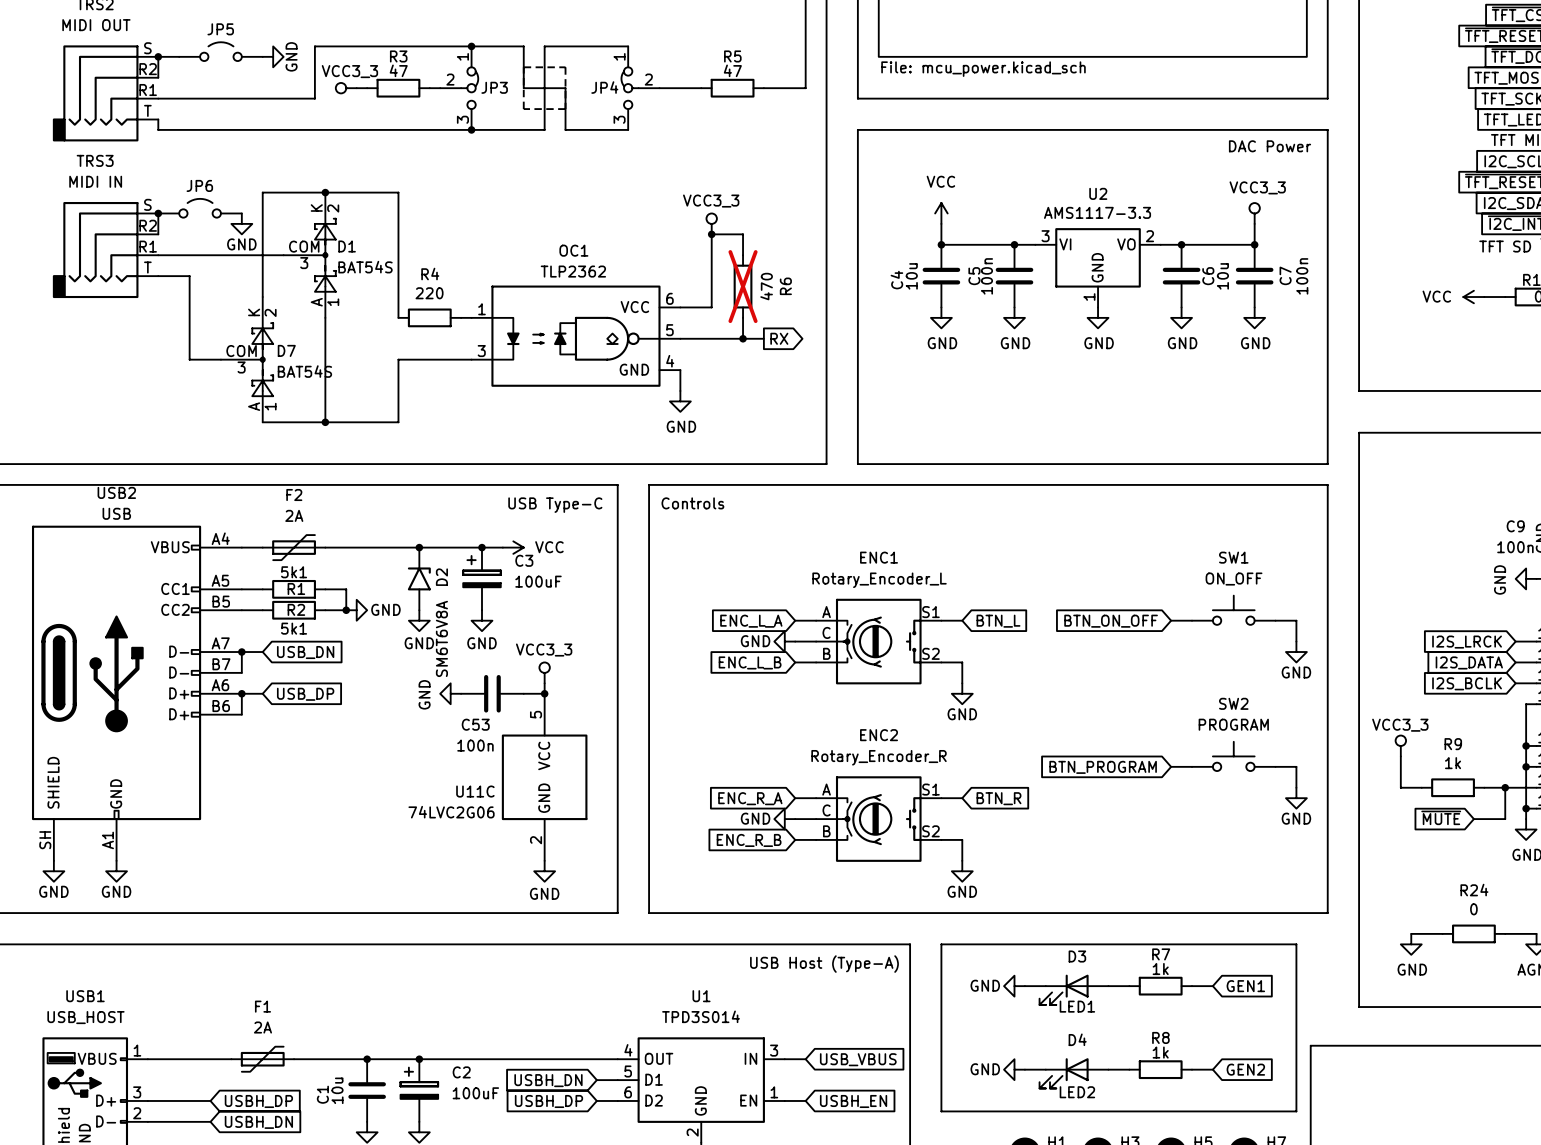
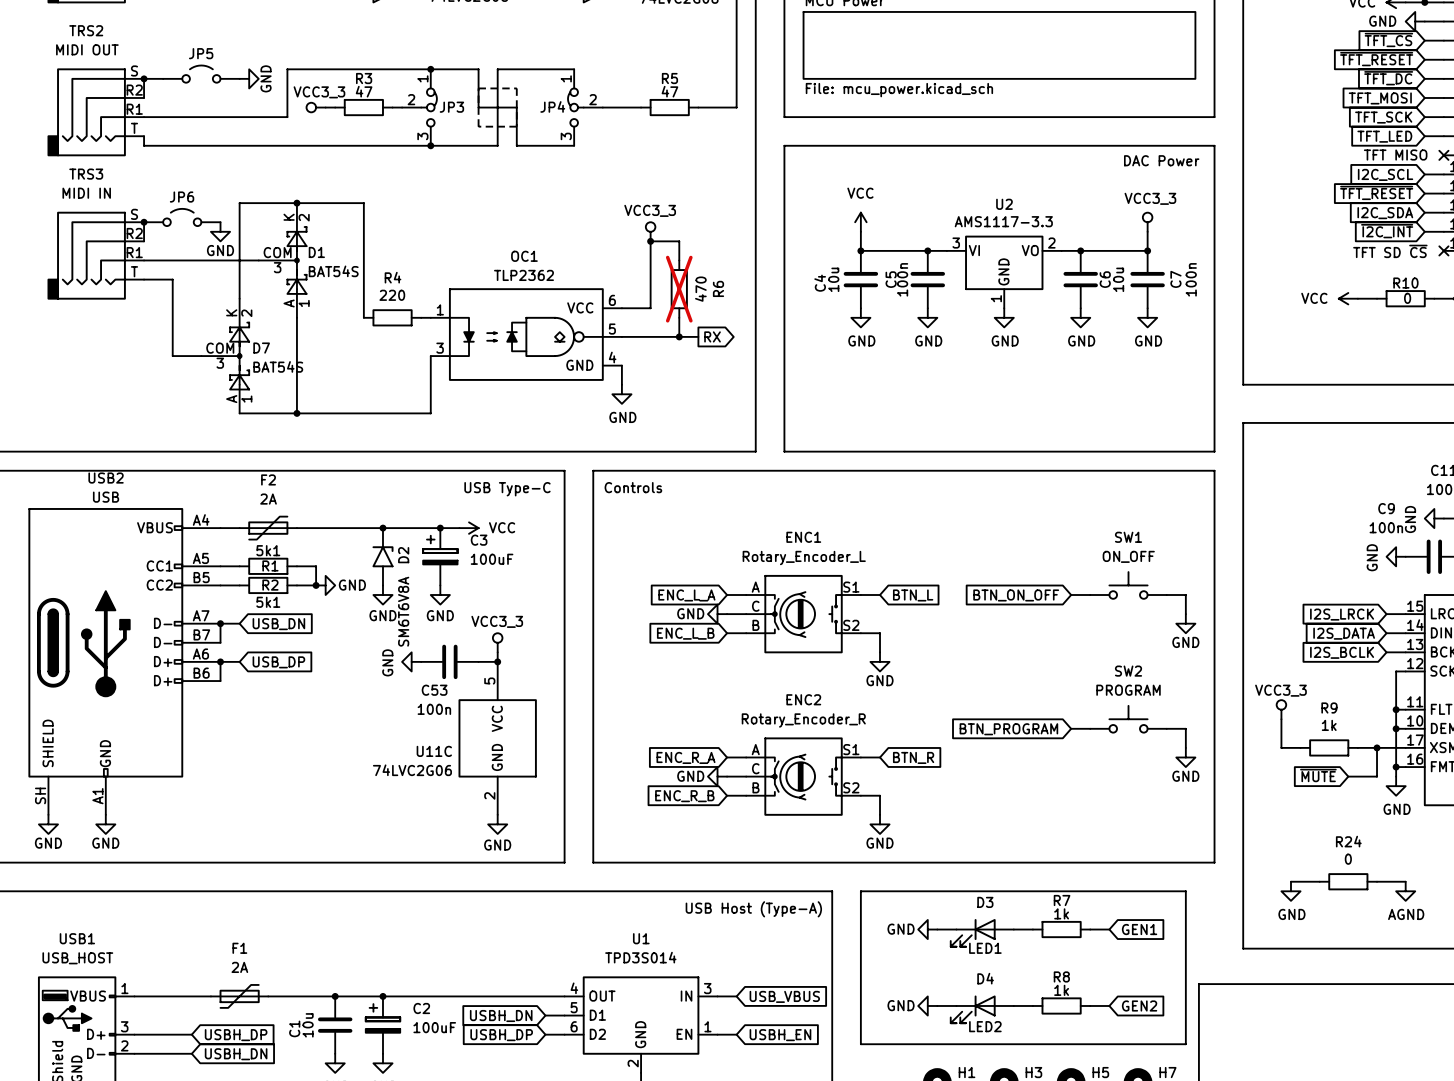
wire: (471, 359) (398, 359) (398, 422) -> (430, 356) (430, 413) (363, 413)

